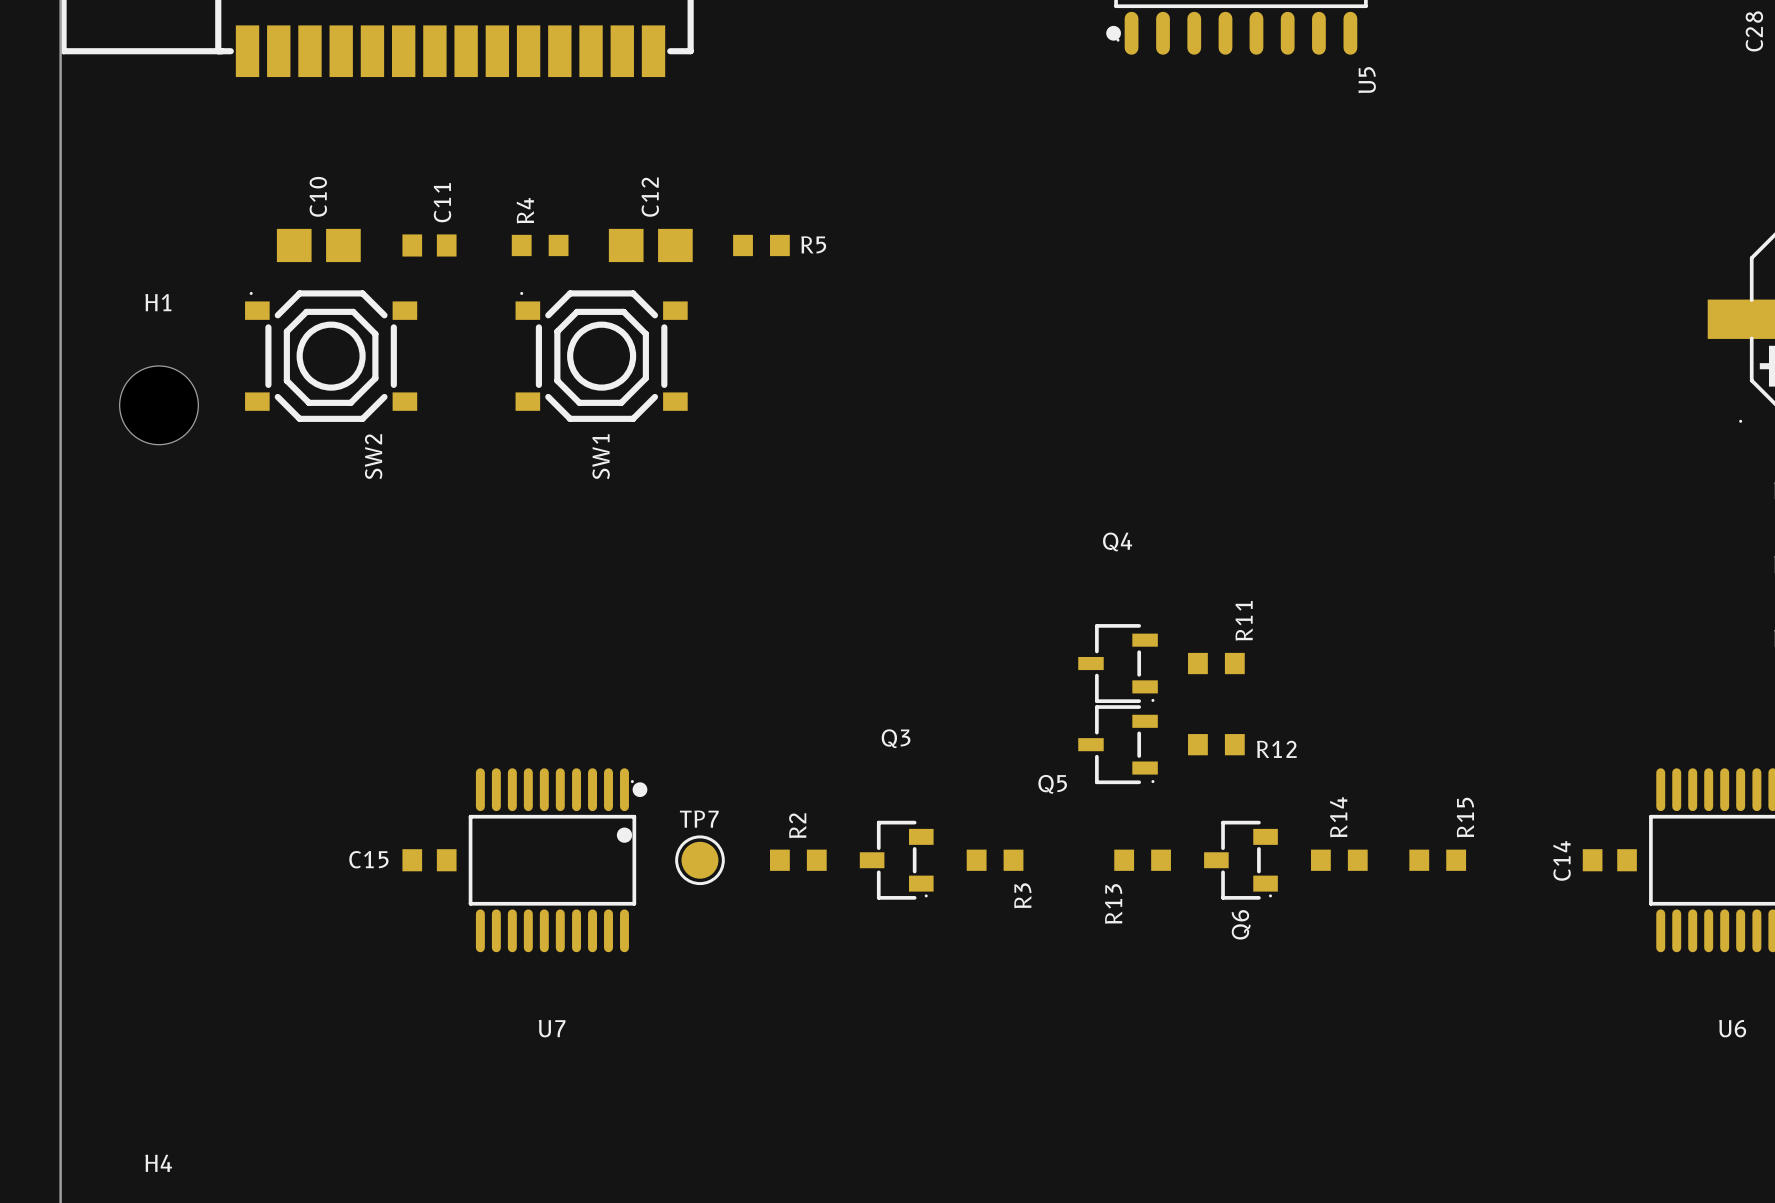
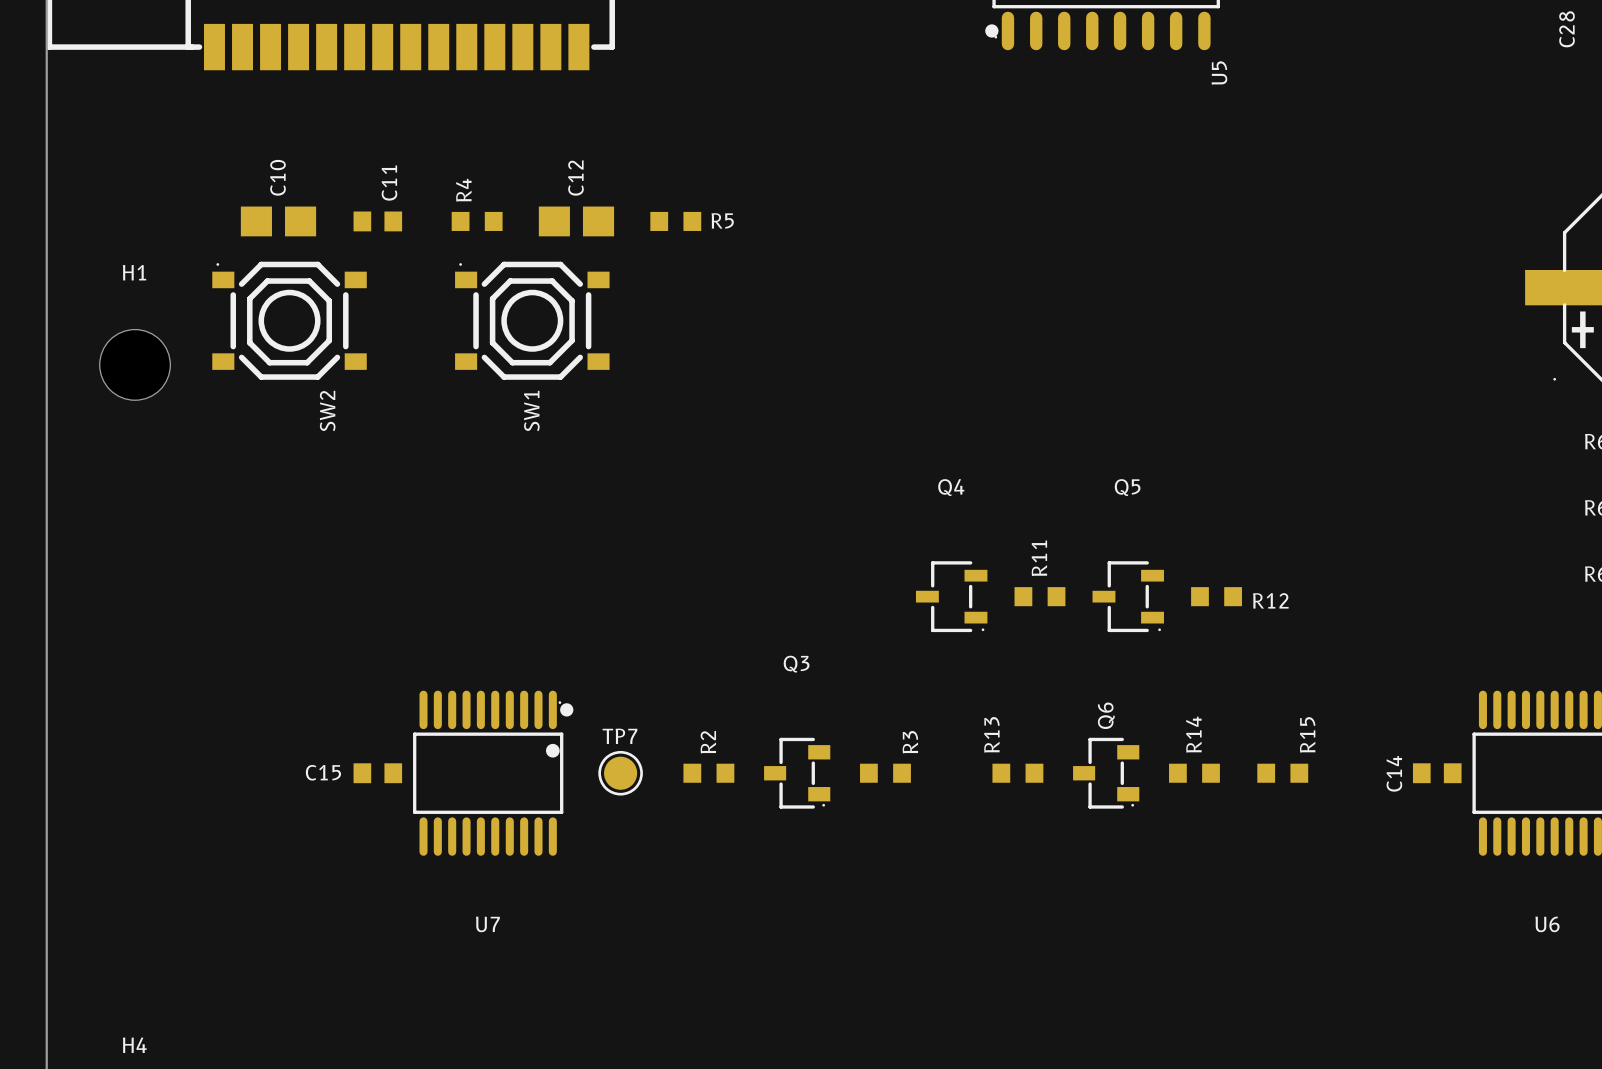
R11 name position: R11 (1244, 620) -> R11 (1039, 558)
Q4 position: (1118, 663) -> (951, 596)
R11 position: (1216, 663) -> (1039, 596)
Q5 position: (1118, 744) -> (1128, 596)
R12 position: (1216, 744) -> (1216, 596)
Q5 name position: Q5 (1052, 784) -> Q5 (1127, 487)
R3 name position: R3 (1022, 895) -> R3 (910, 742)
R13 name position: R13 (1113, 903) -> R13 (991, 734)
Q6 name position: Q6 (1241, 924) -> Q6 (1106, 715)

